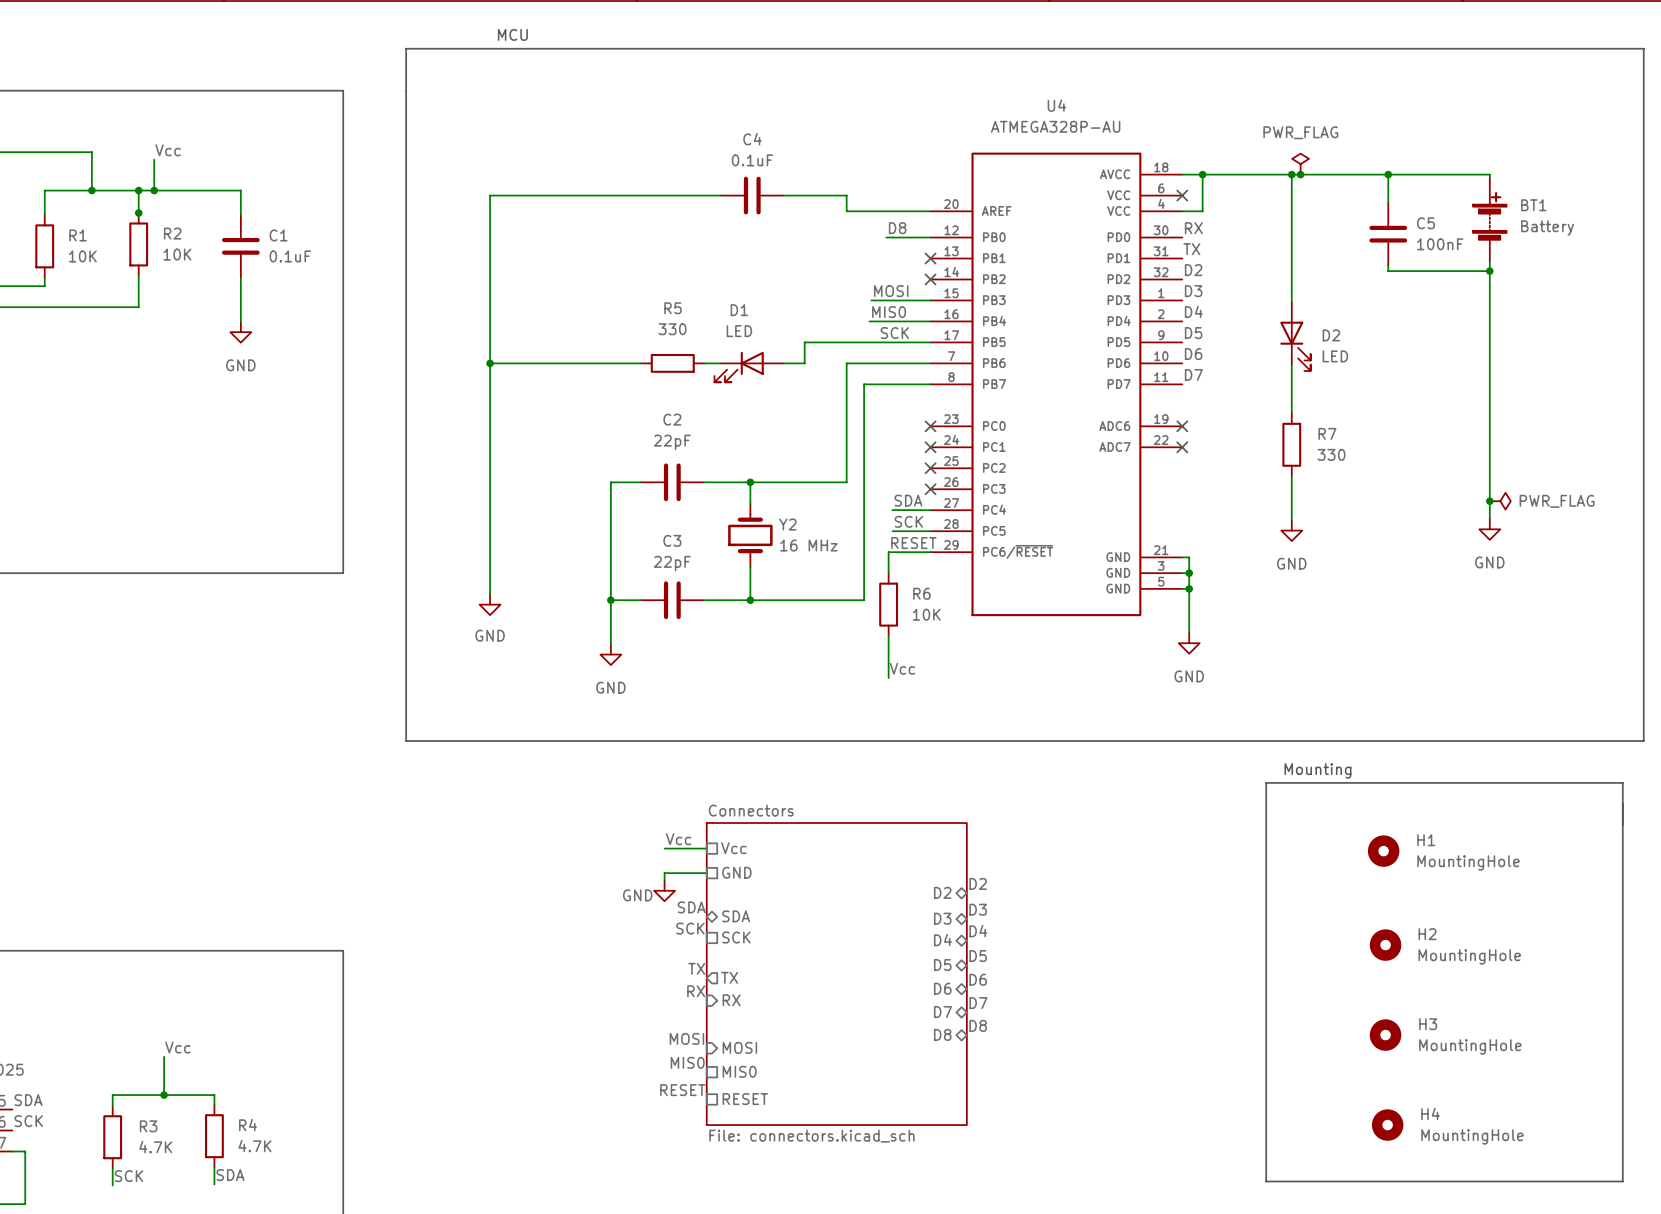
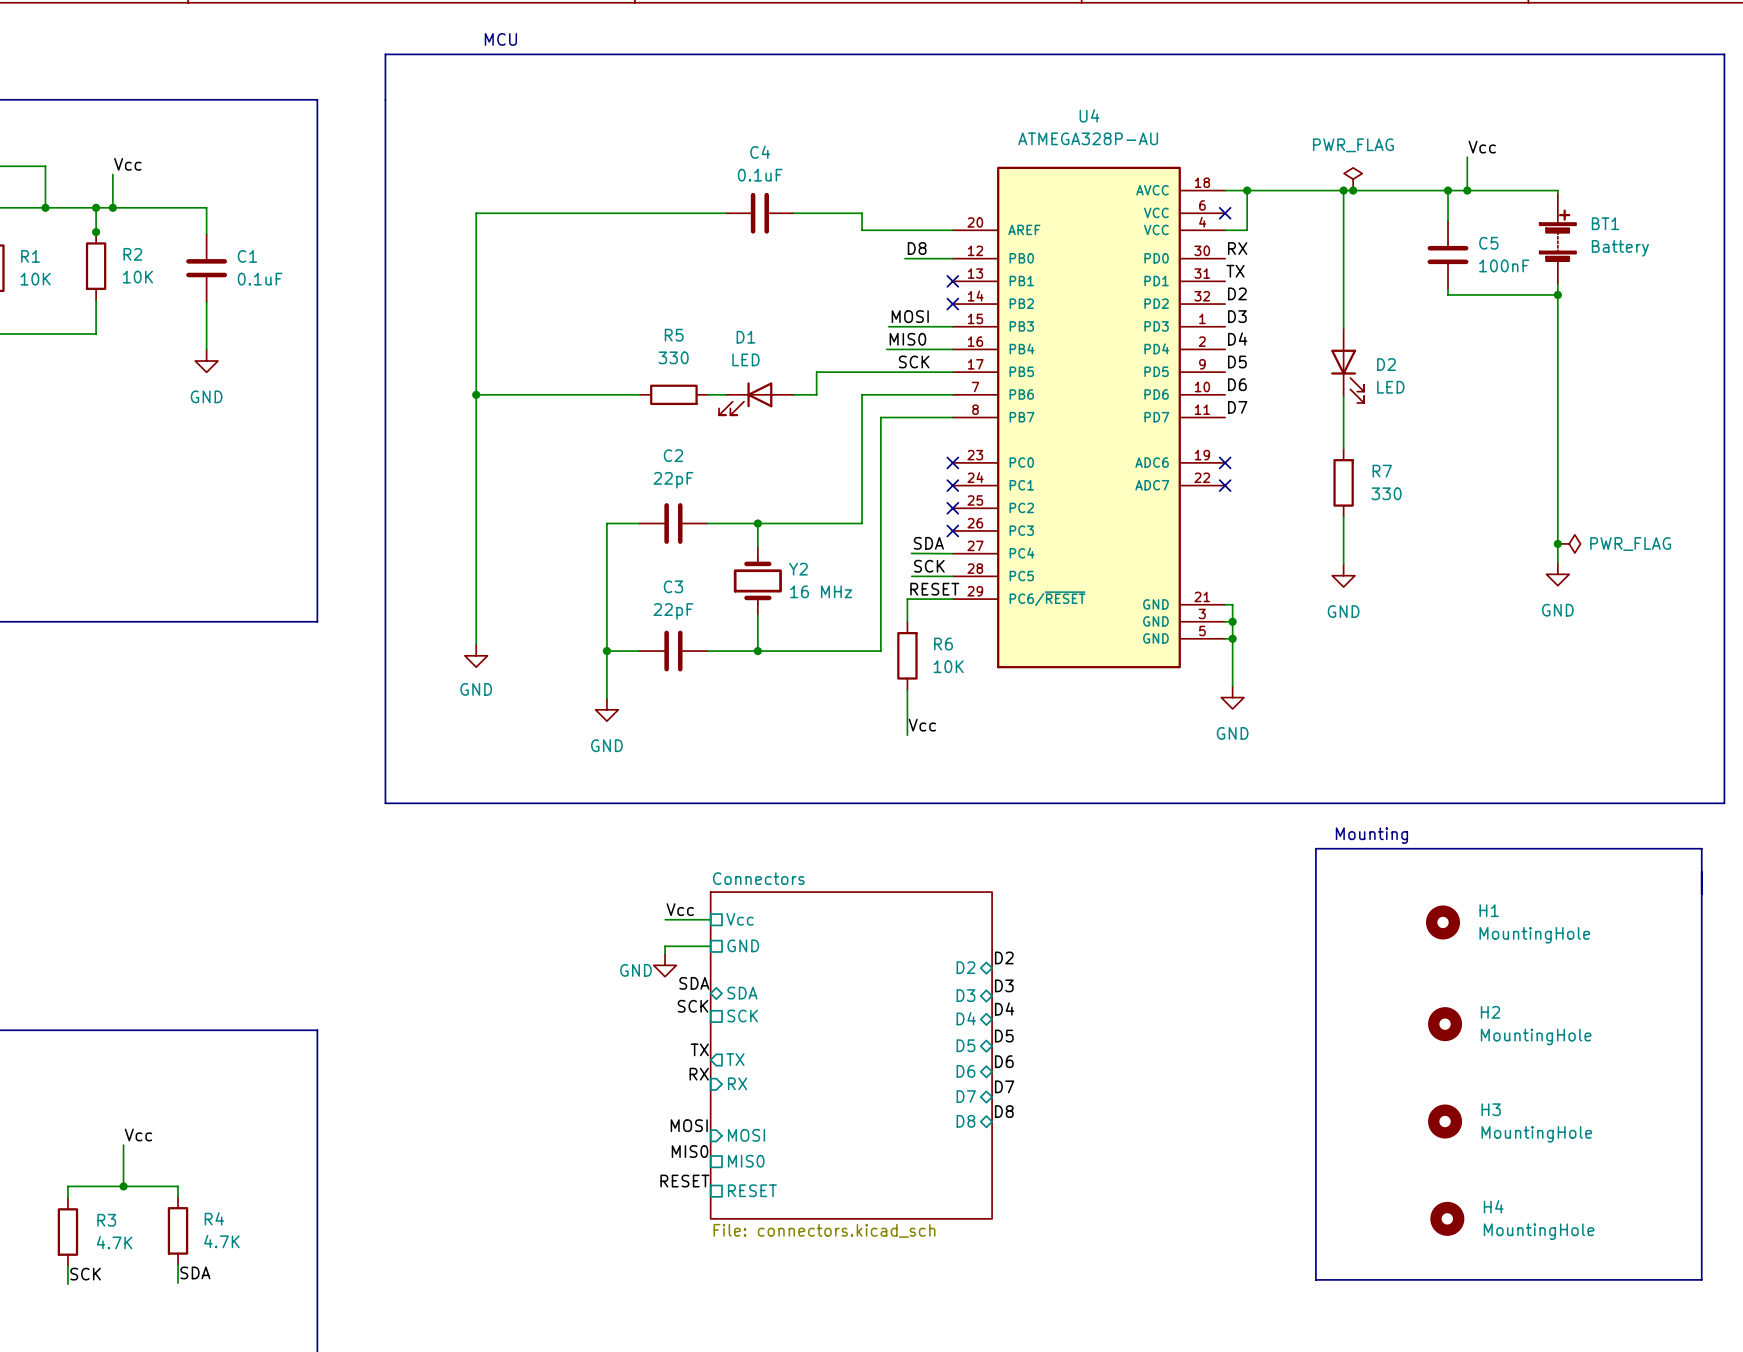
label: none -> Vcc (1482, 147)
wire: none -> (1467, 157) (1467, 190)
junction: none -> (1467, 190)

